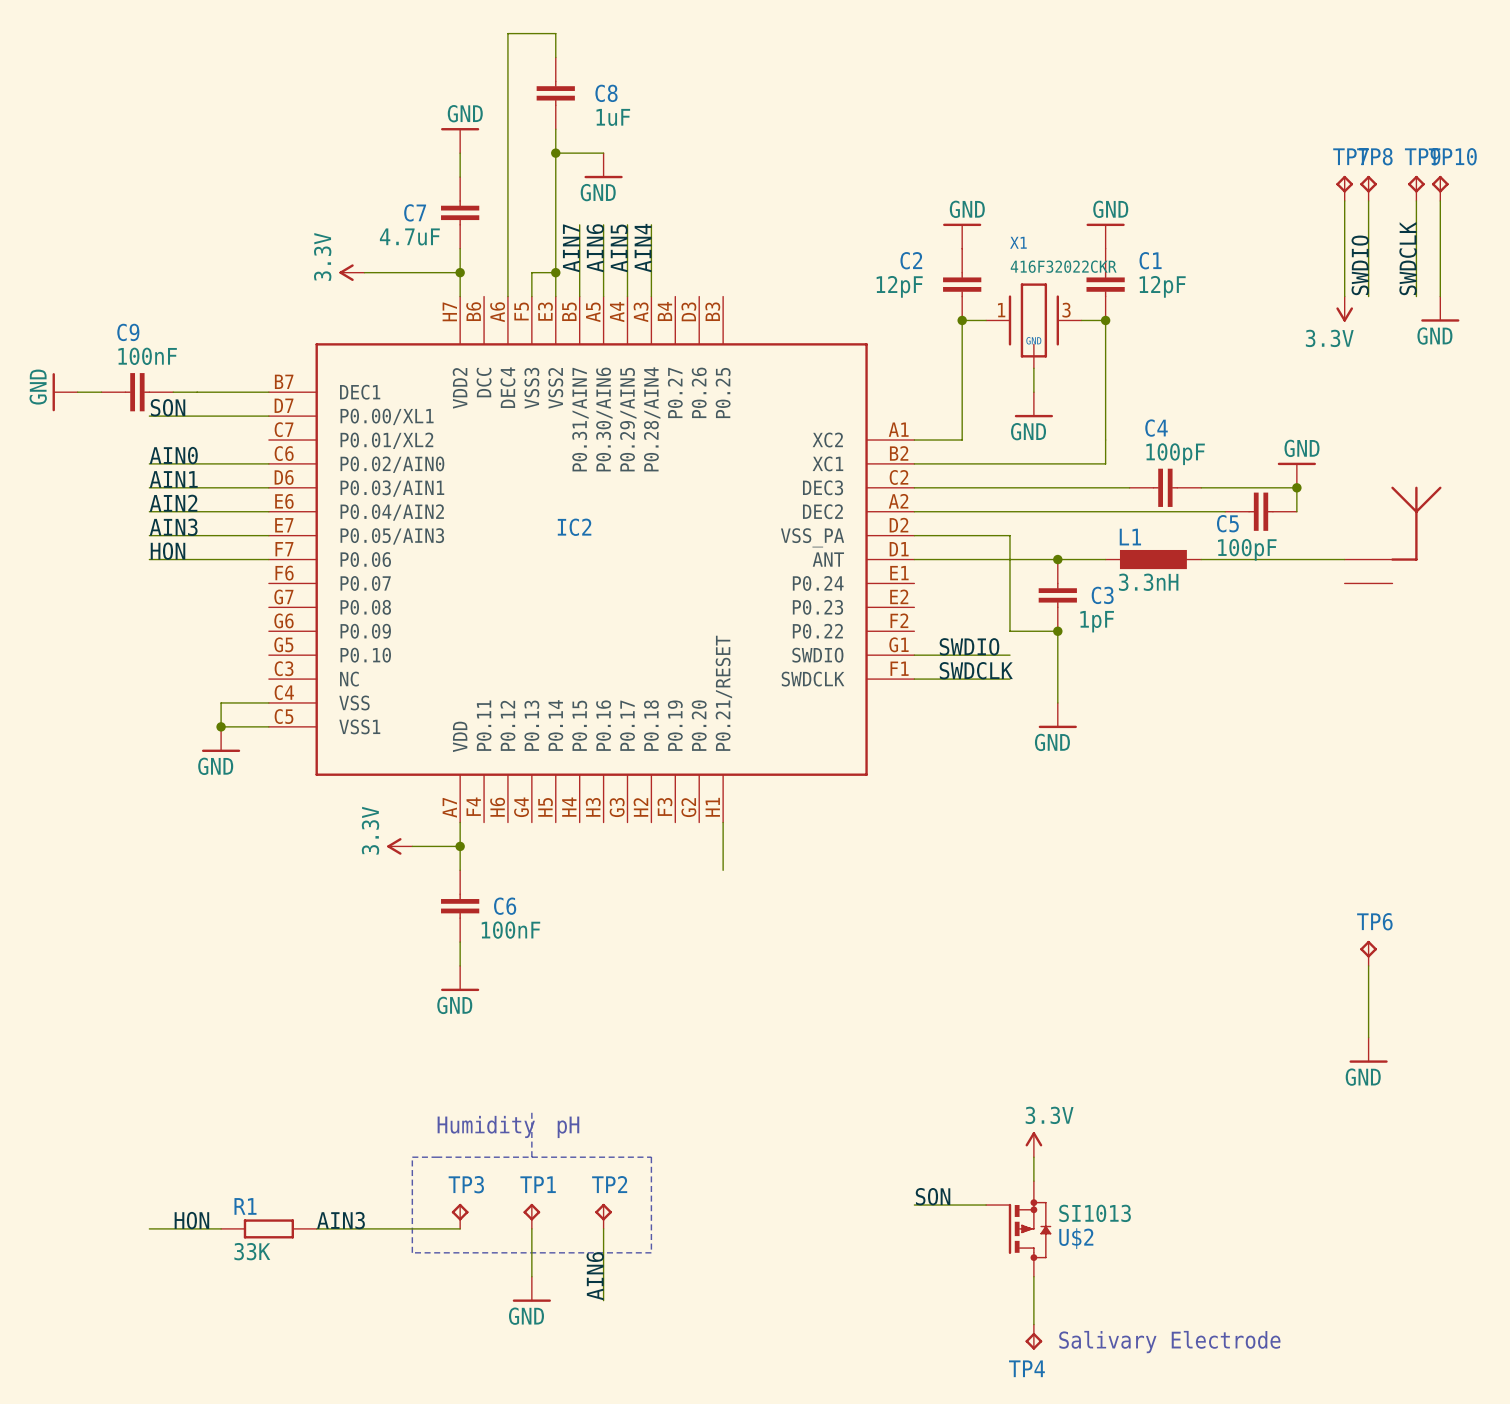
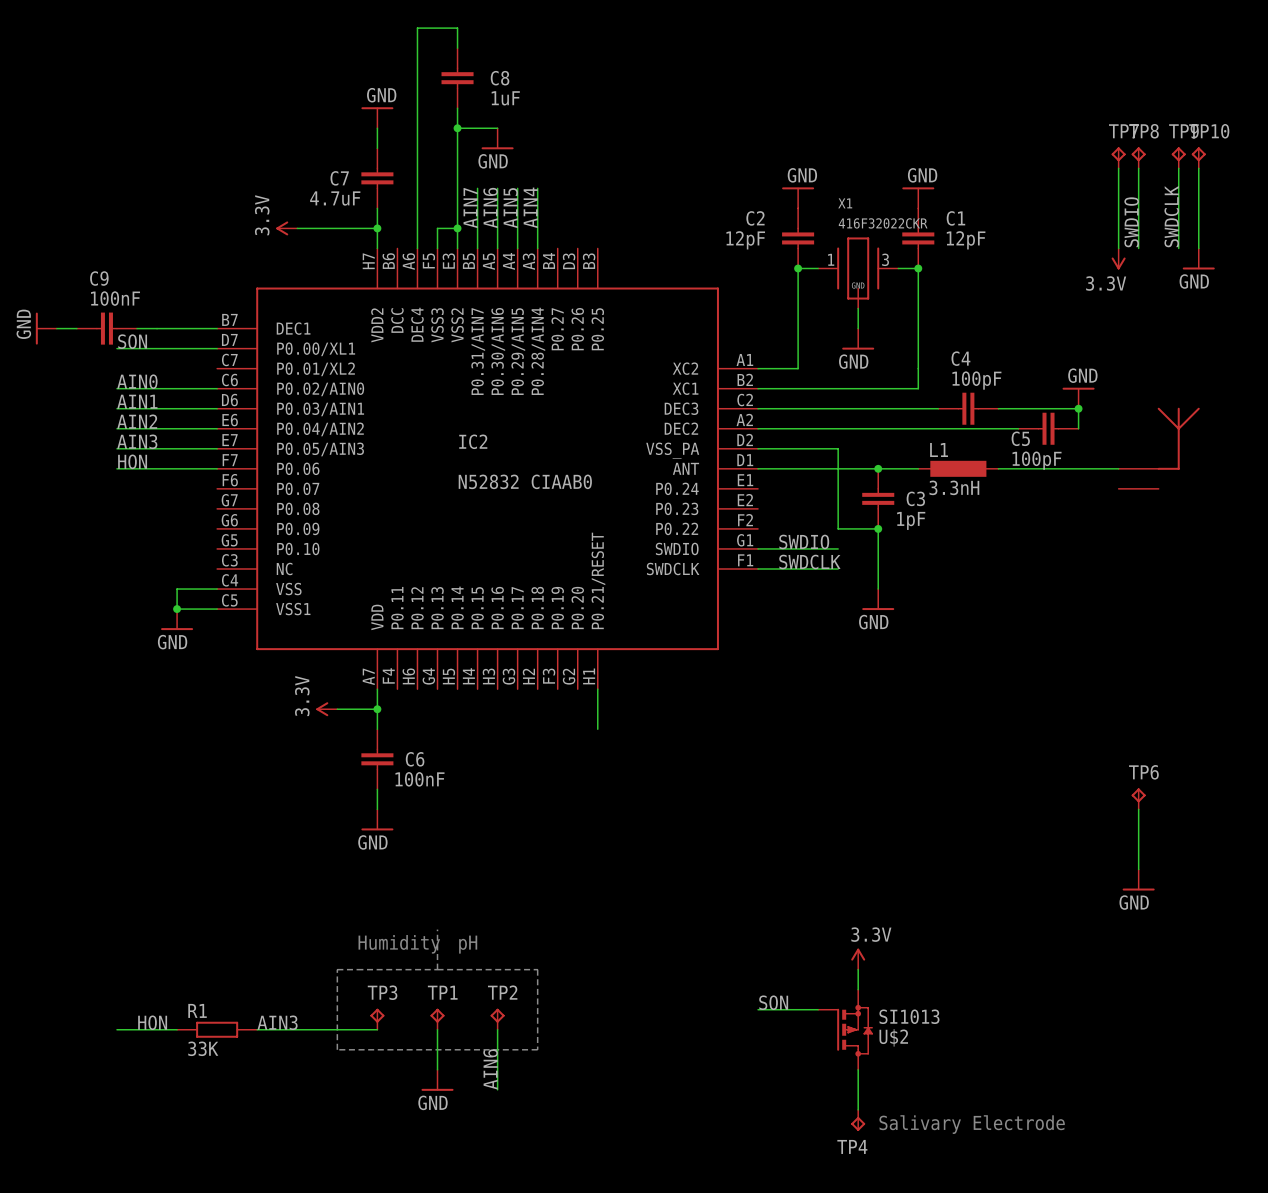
IC2 value: none -> N52832 CIAAB0 (525, 481)

